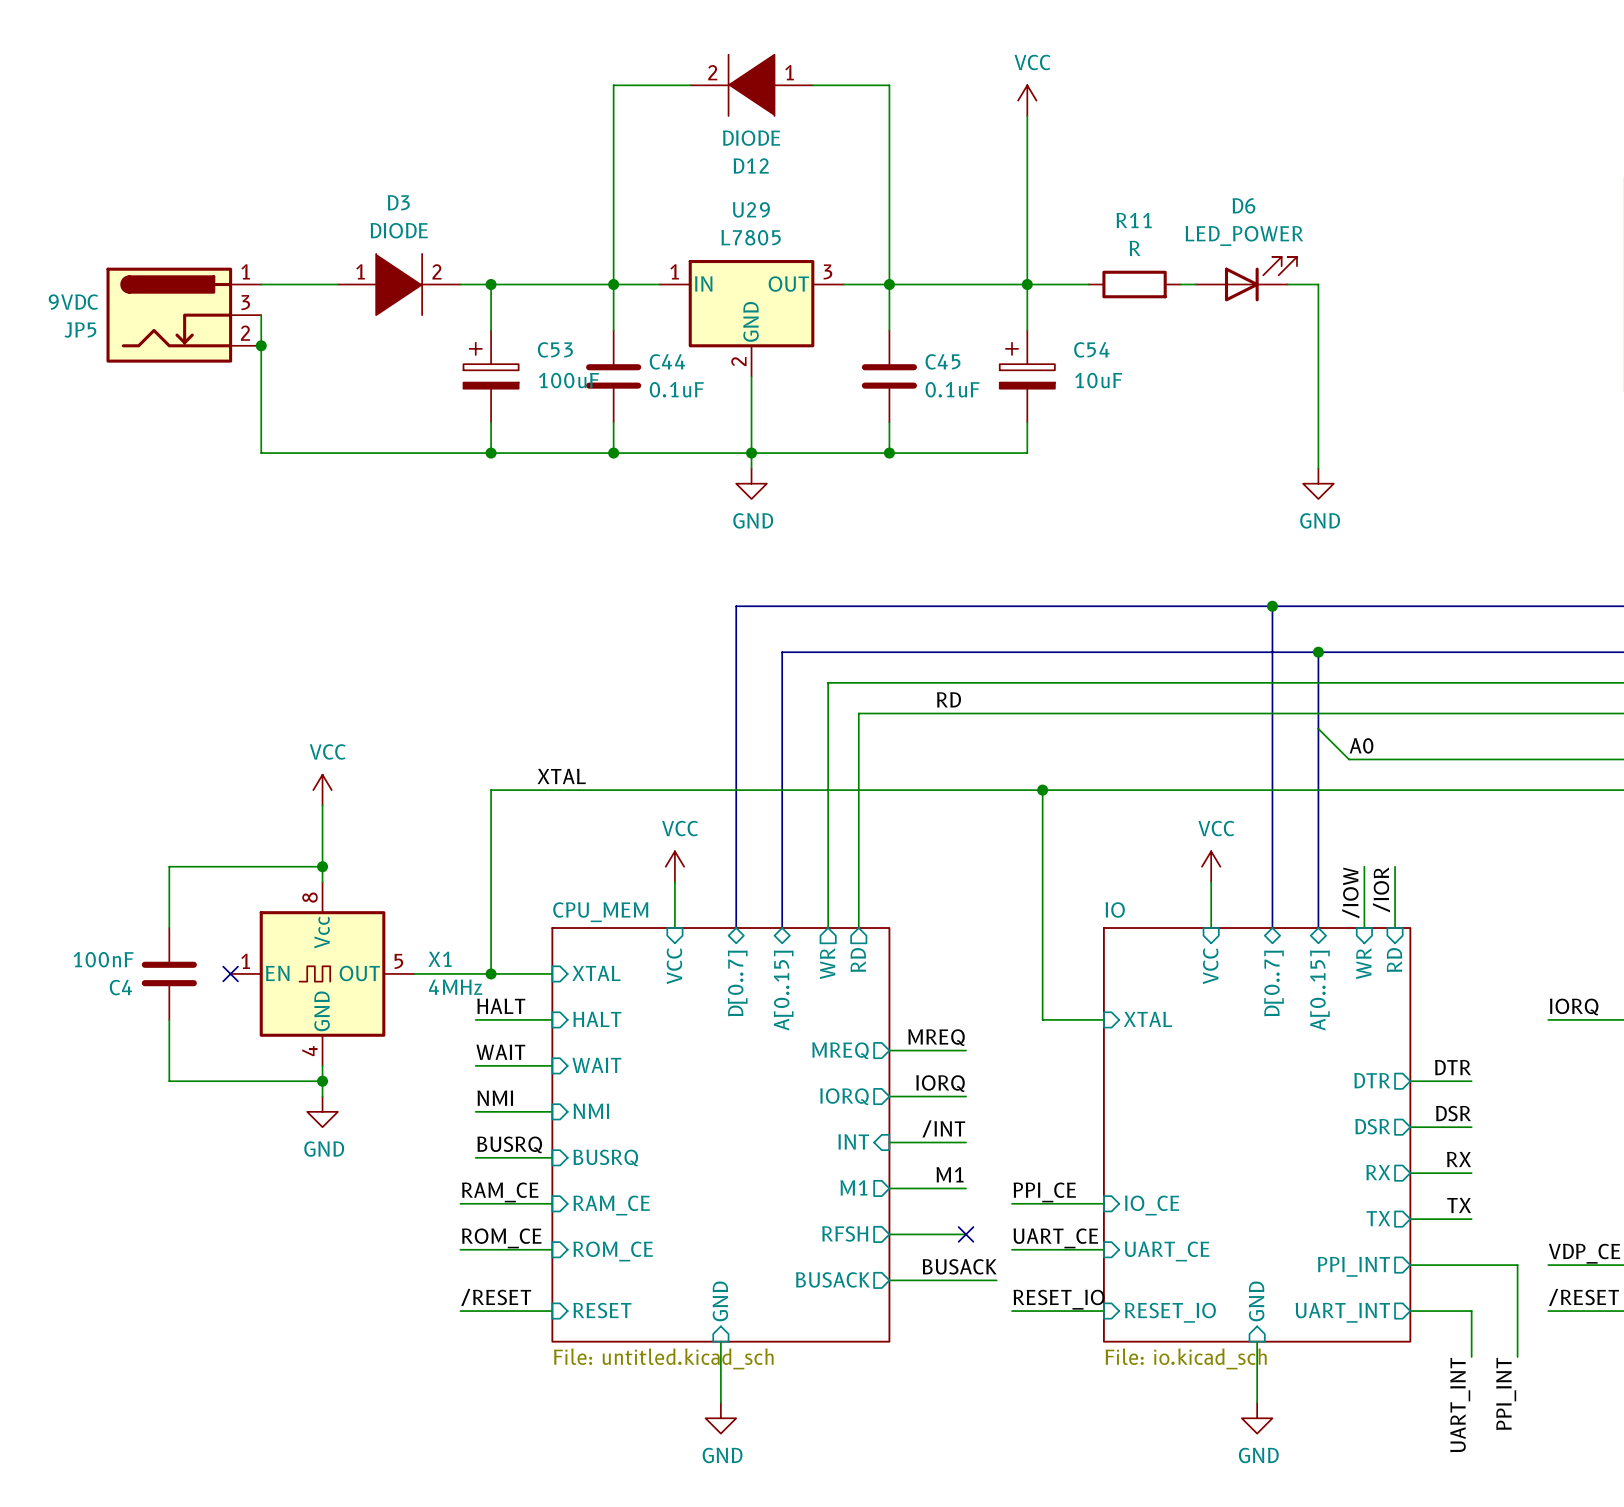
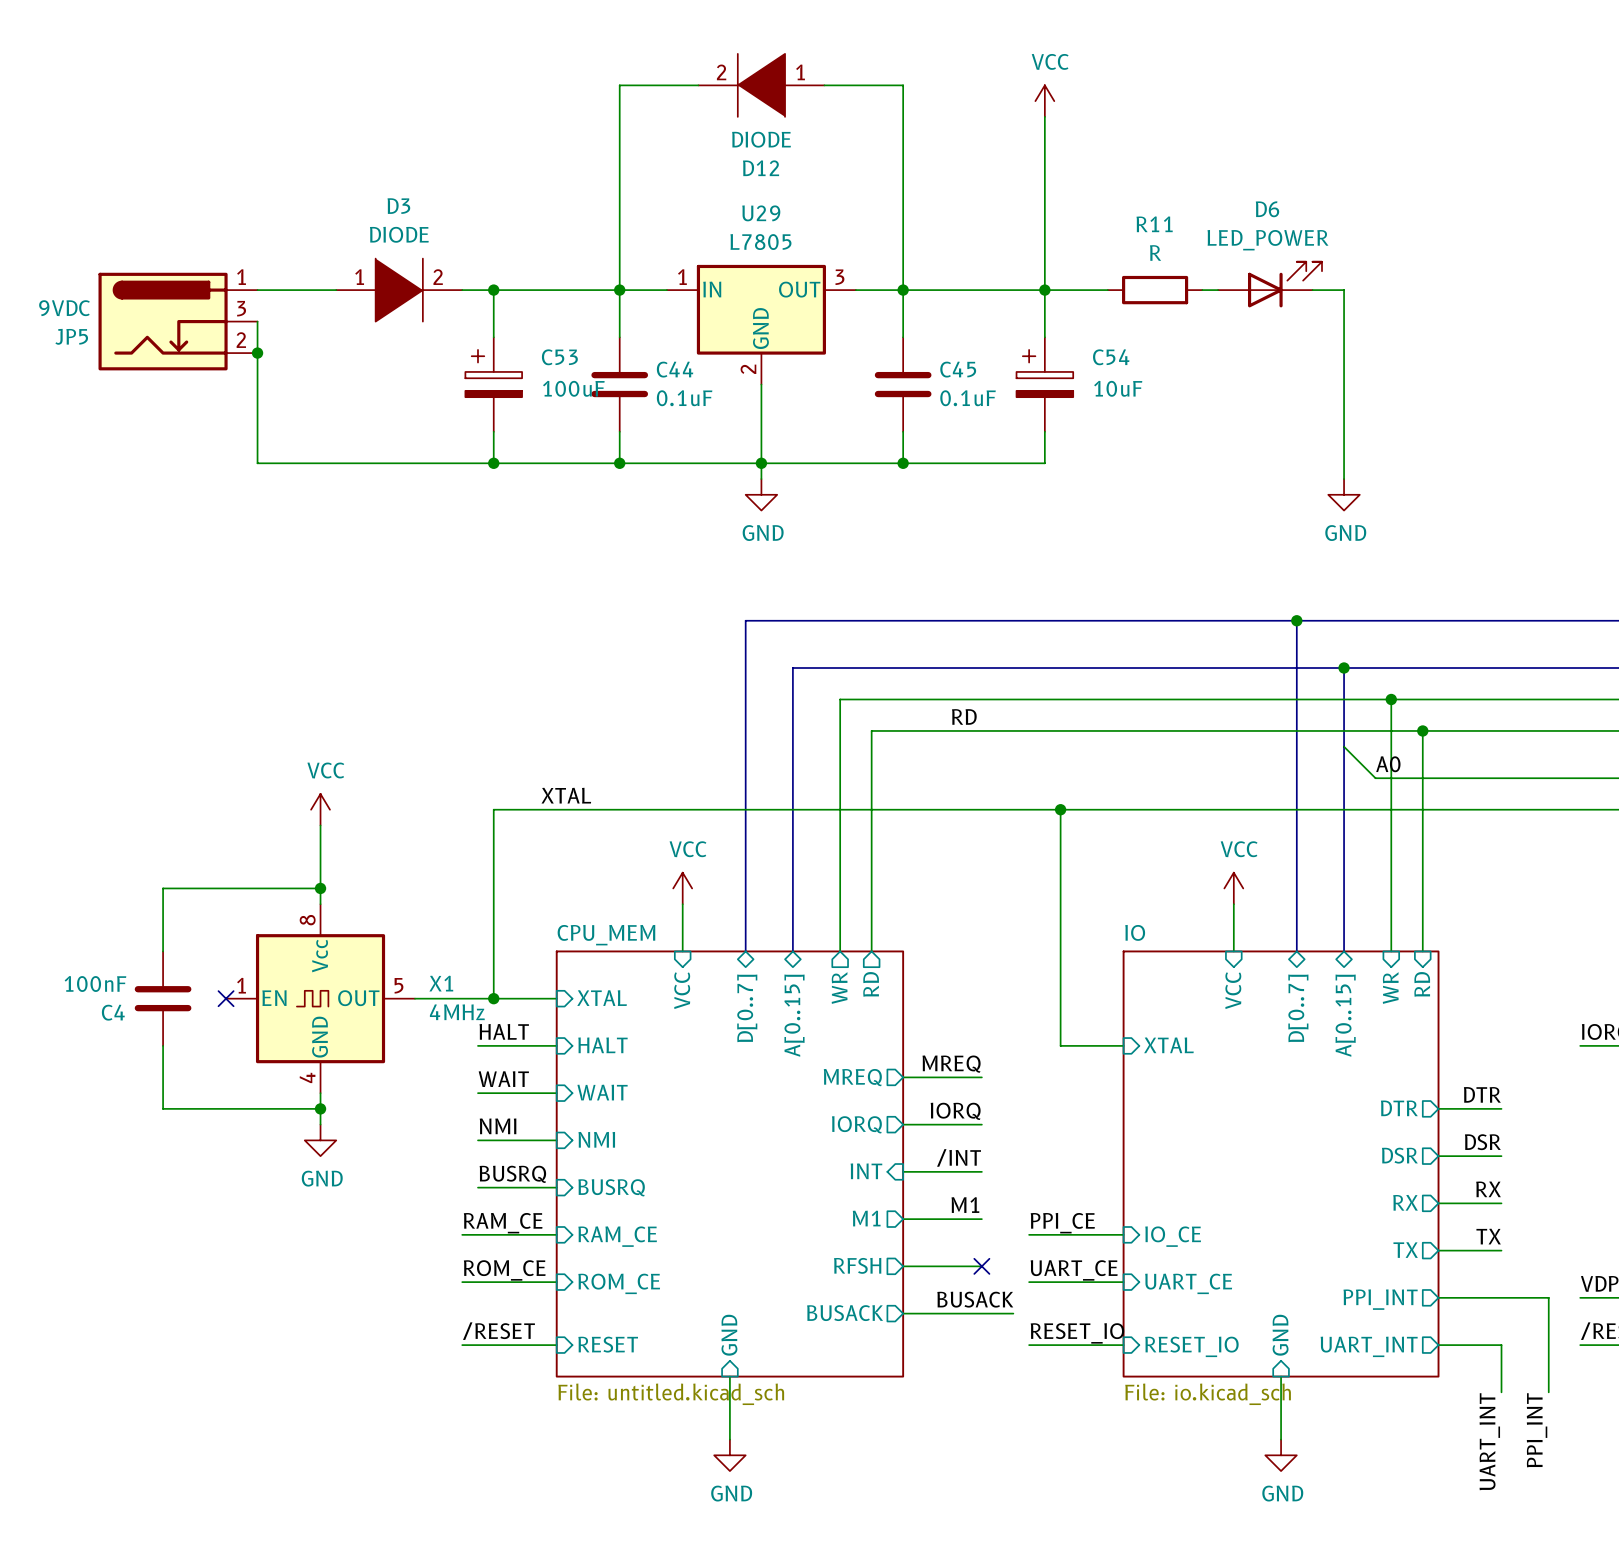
wire: none -> (1391, 699) (1391, 888)
junction: none -> (1391, 699)
wire: none -> (1422, 730) (1422, 888)
junction: none -> (1422, 730)
label: /IOR (1381, 889) -> none
label: /IOW (1350, 892) -> none

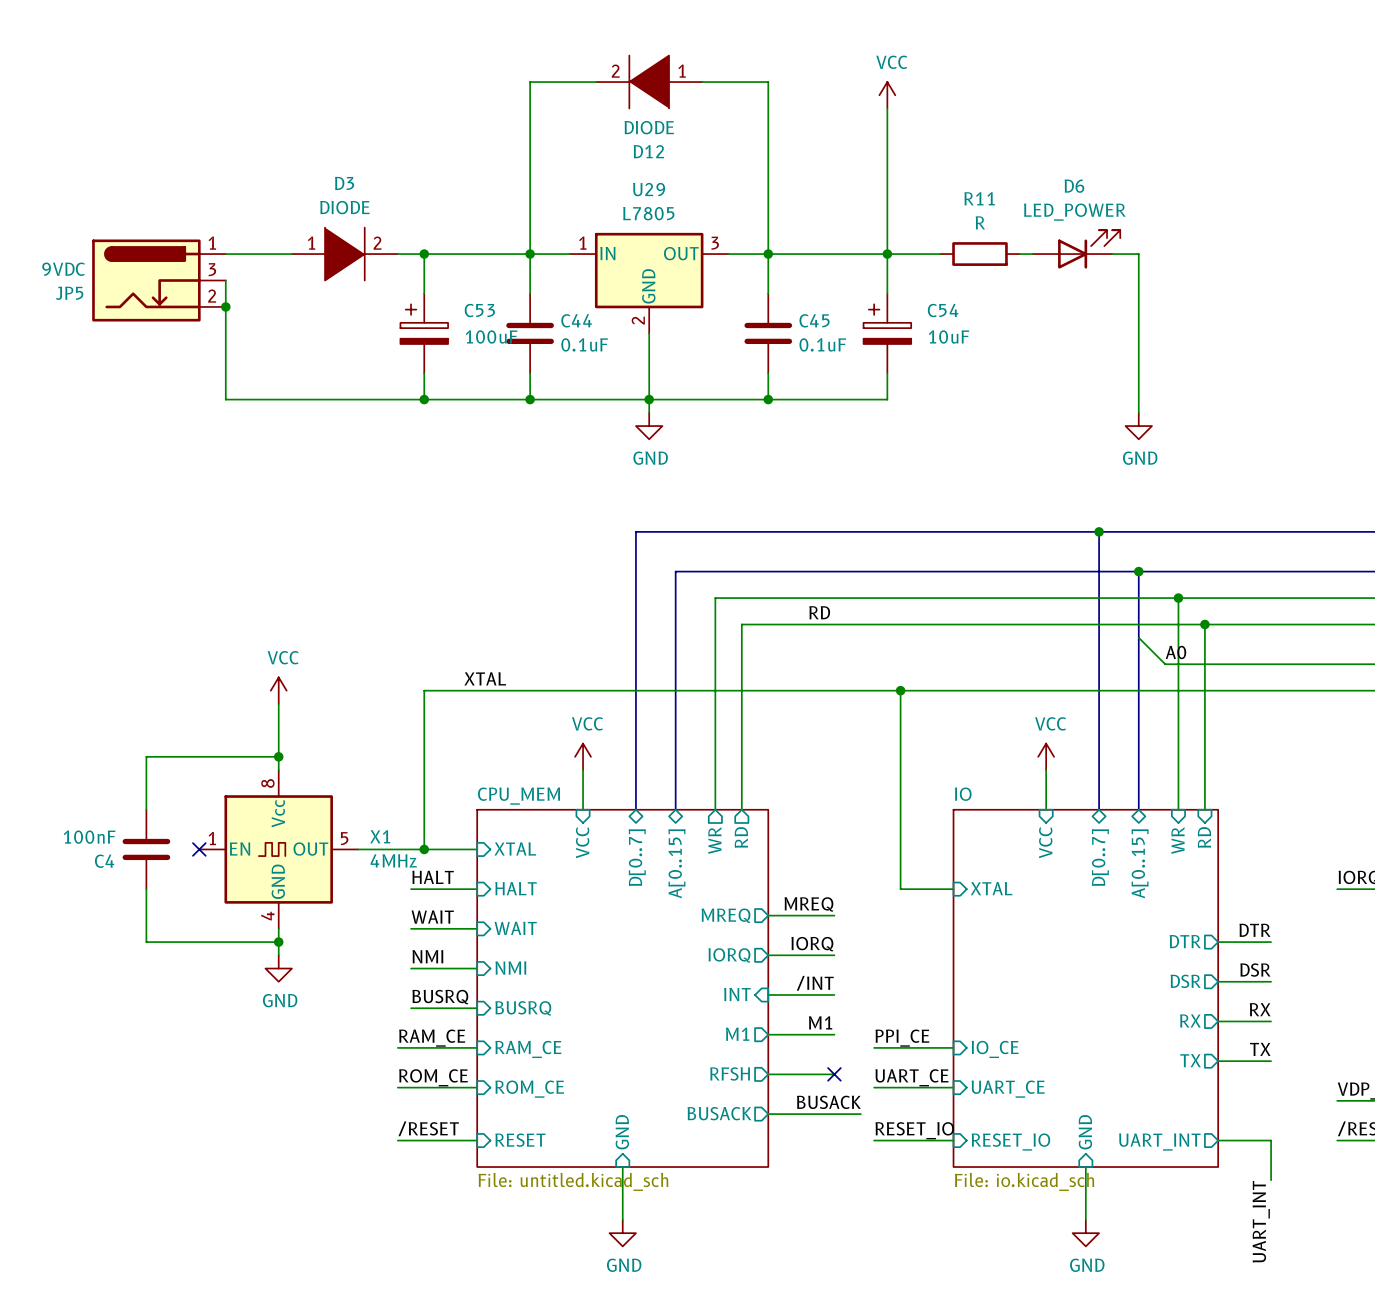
wire: (1438, 1297) (1548, 1297) (1548, 1392) -> none
sheet pin: PPI_INT (1380, 1299) -> none
label: PPI_INT (1537, 1430) -> none

